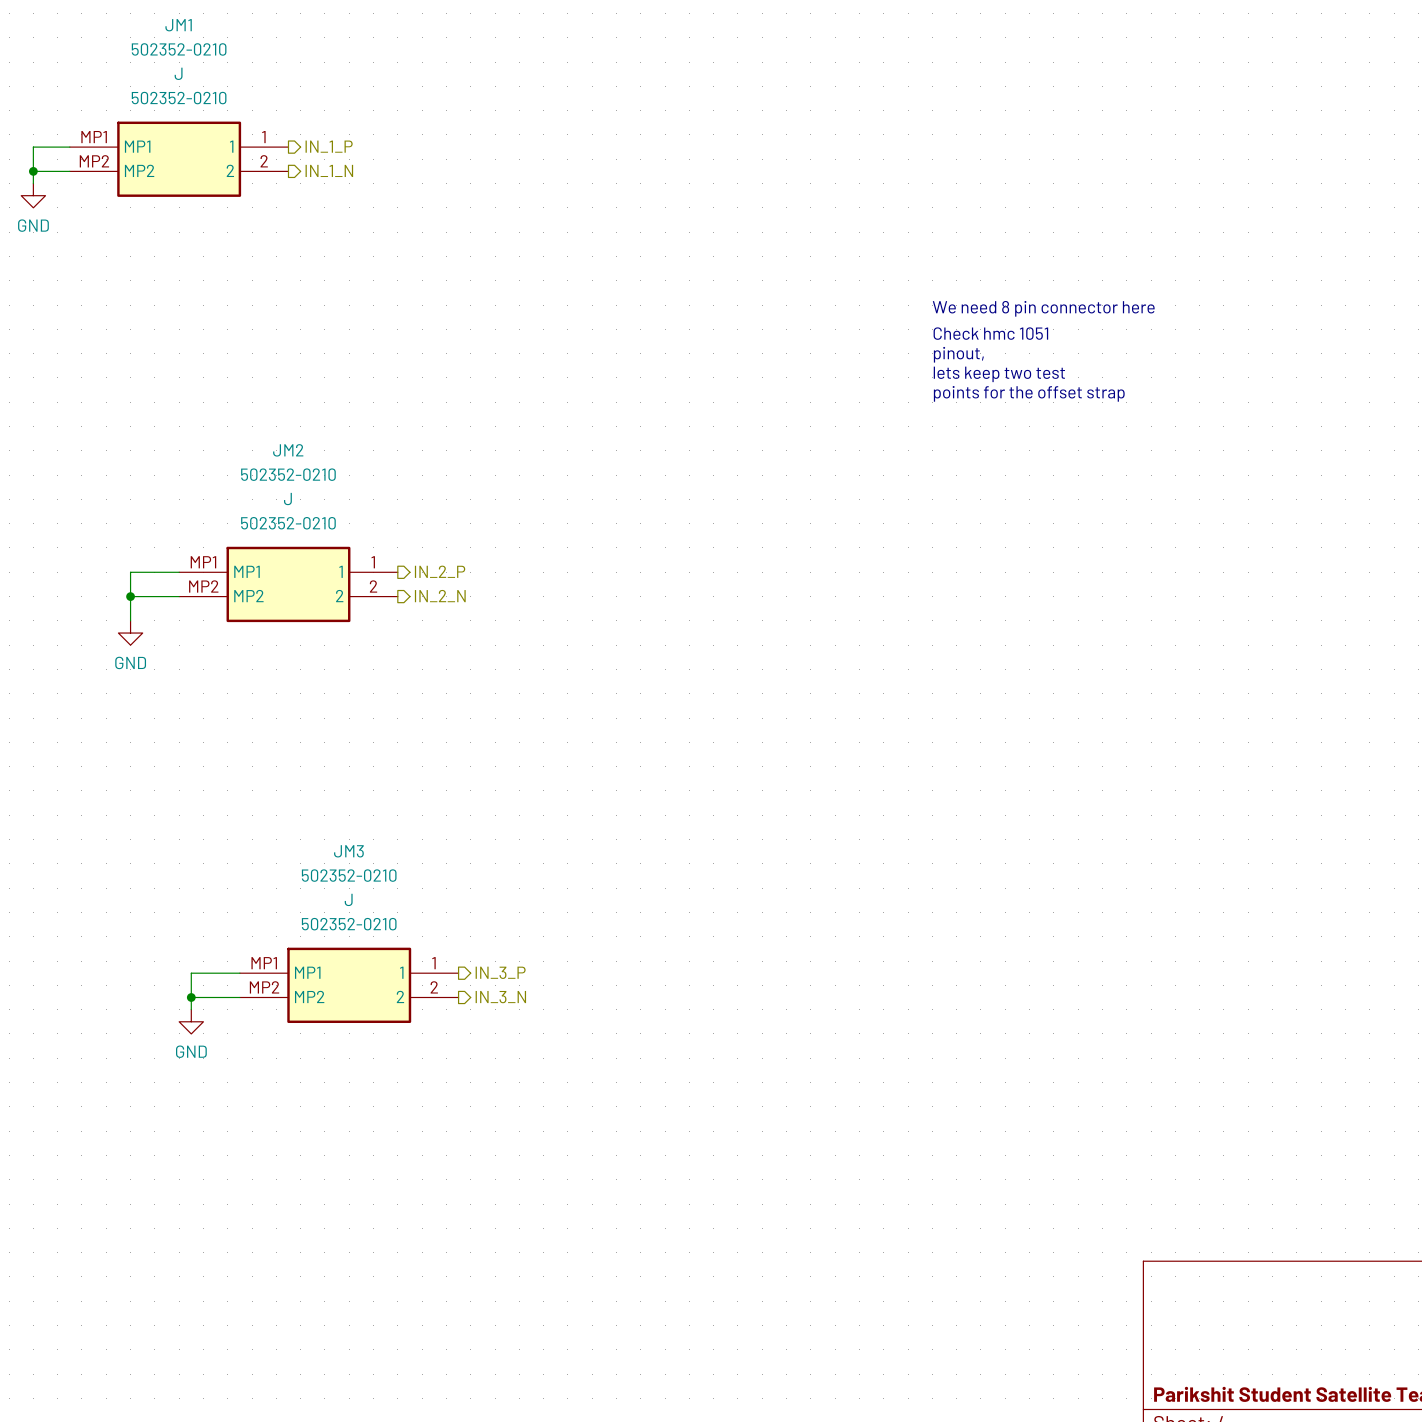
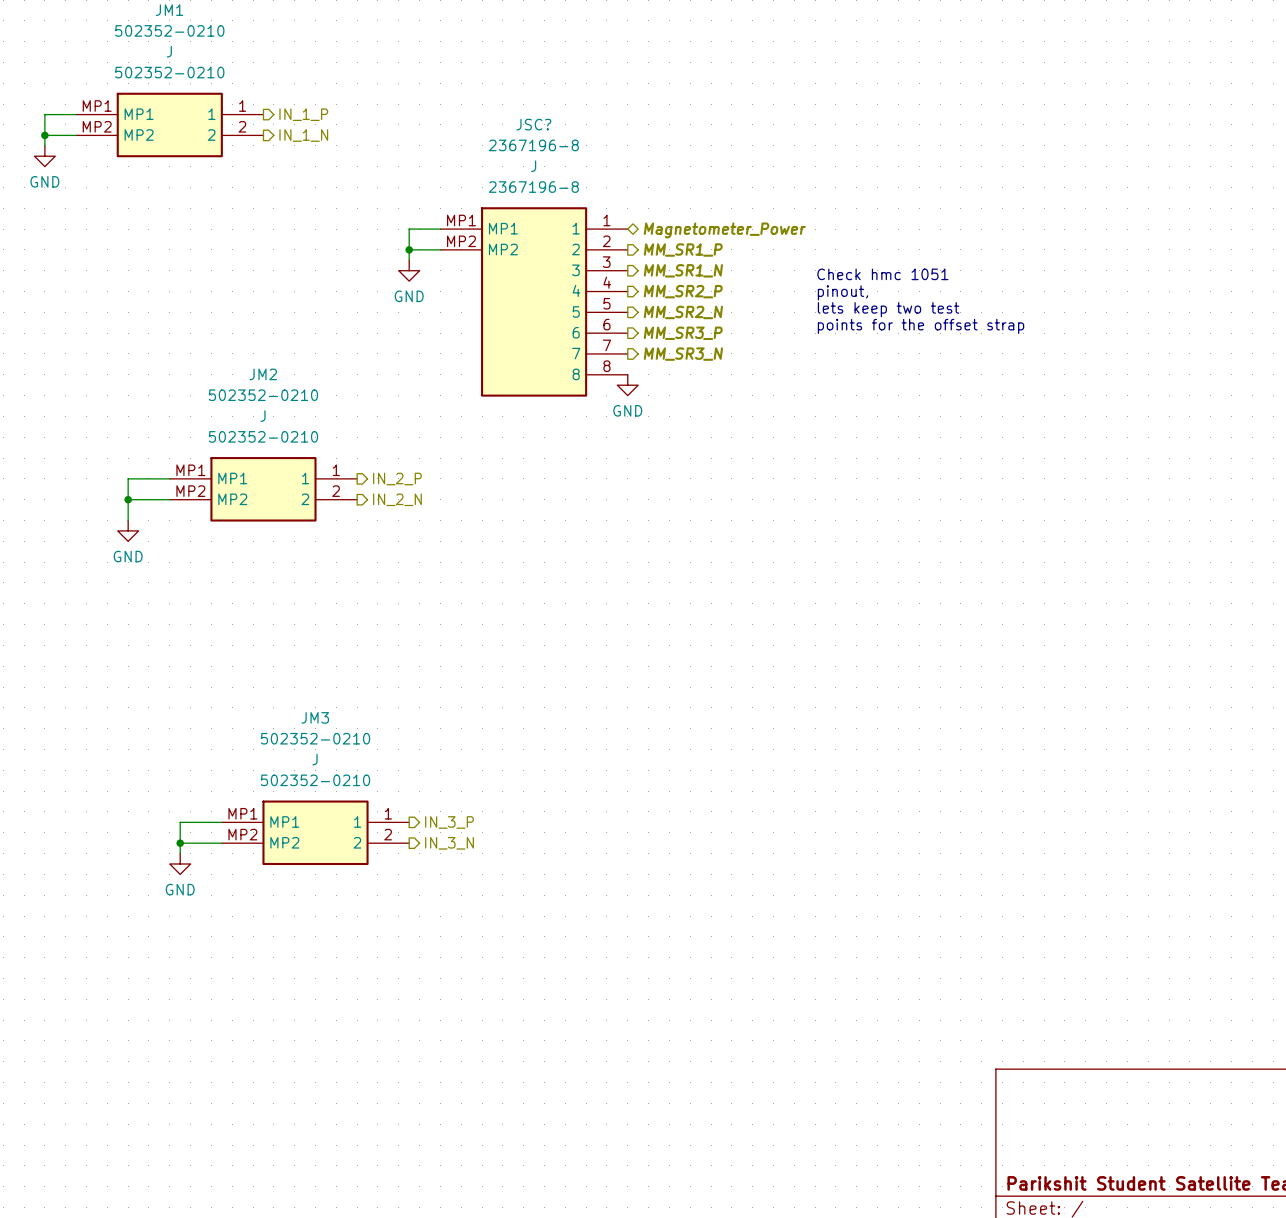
wire: none -> (440, 229) (409, 229) (409, 260)
hierarchical label: none -> Magnetometer_Power (724, 230)
hierarchical label: none -> MM_SR1_P (683, 250)
wire: none -> (409, 249) (440, 249)
junction: none -> (409, 249)
text: We need 8 pin connector here (1043, 308) -> none
hierarchical label: none -> MM_SR1_N (683, 270)
power symbol: none -> GND (409, 270)
hierarchical label: none -> MM_SR2_P (683, 291)
JSC?: none -> 2367196-8 (534, 301)
hierarchical label: none -> MM_SR2_N (683, 312)
hierarchical label: none -> MM_SR3_P (683, 333)
hierarchical label: none -> MM_SR3_N (683, 354)
power symbol: none -> GND (627, 385)

